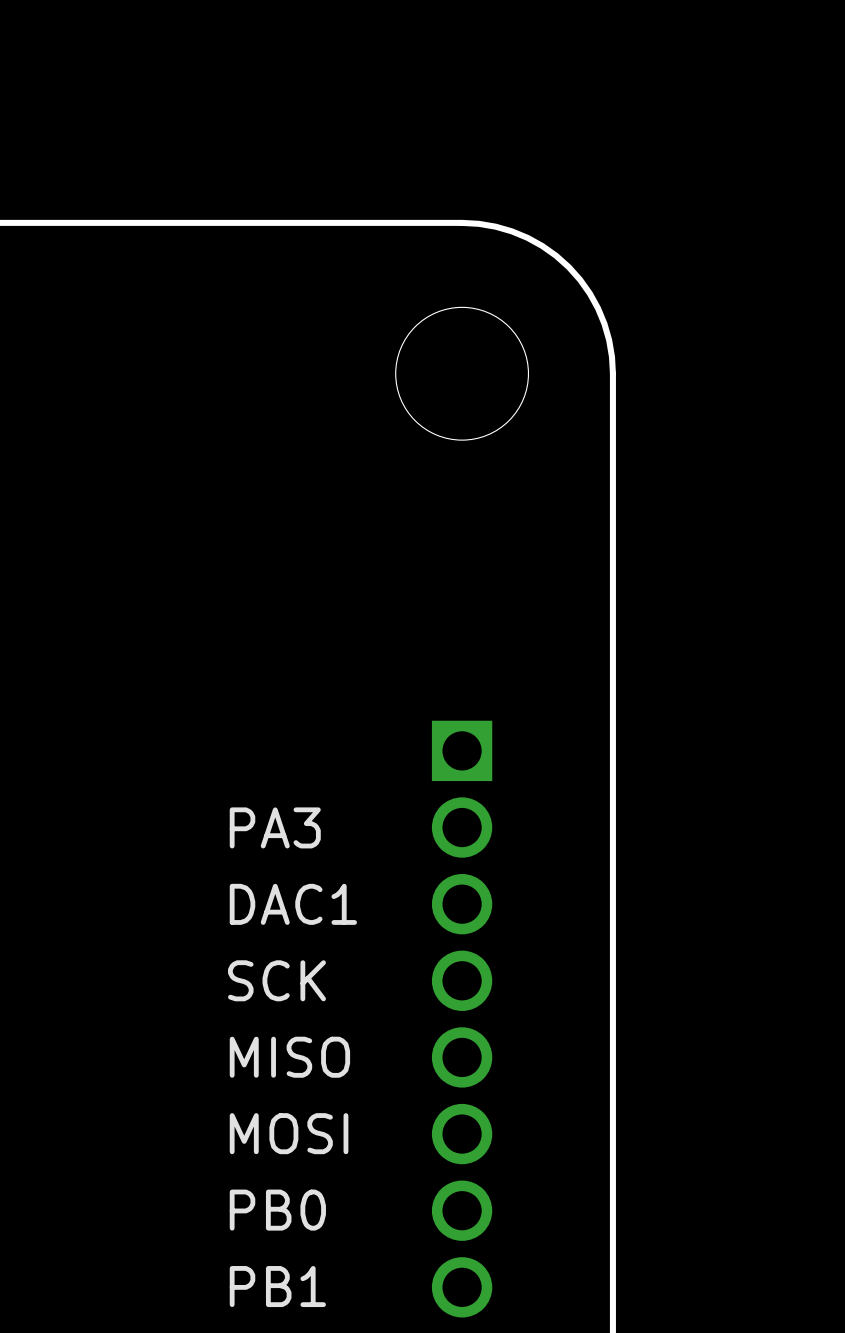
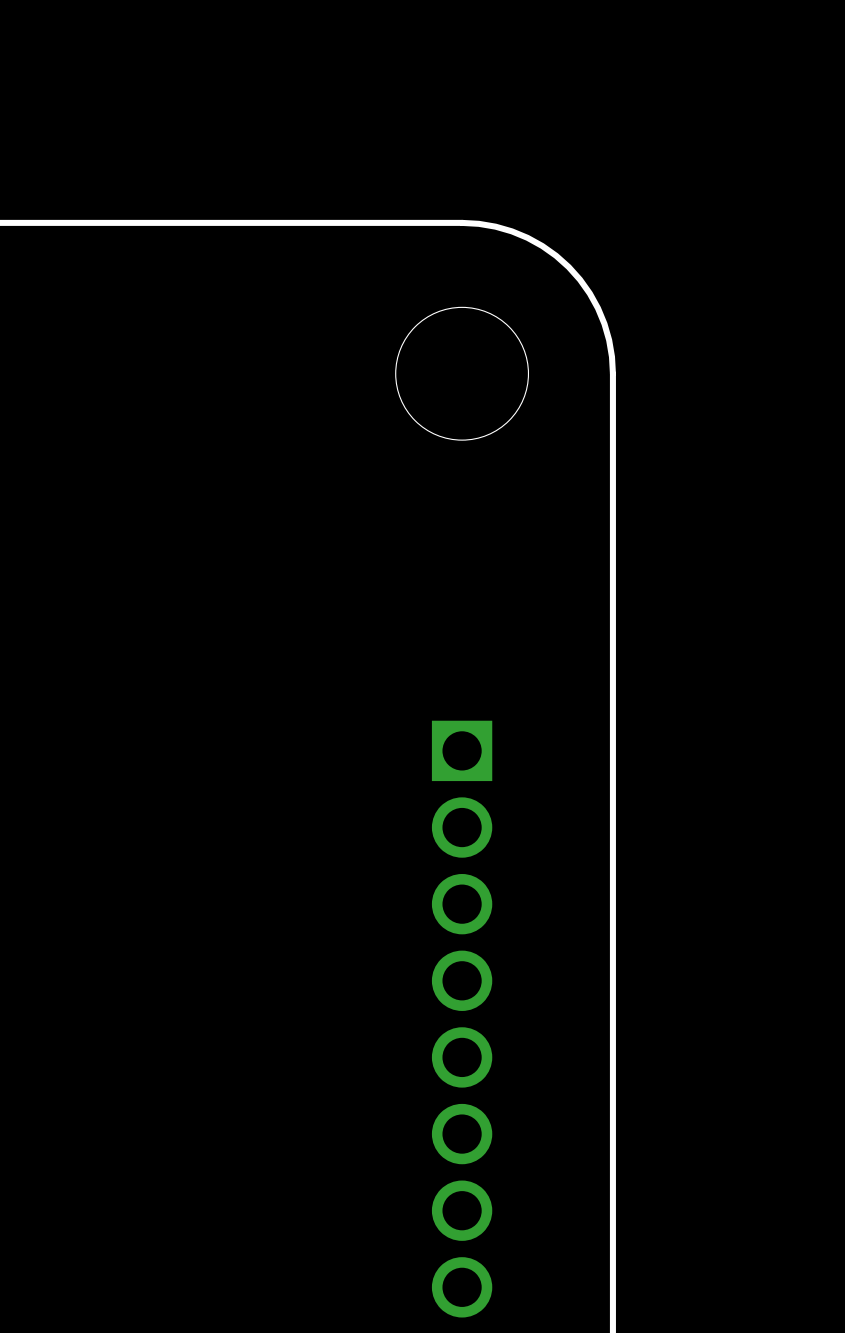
text: PA3 (275, 827) -> none
text: DAC1 (293, 904) -> none
text: SCK (276, 980) -> none
text: MISO (289, 1057) -> none
text: MOSI (289, 1133) -> none
text: PB0 (277, 1210) -> none
text: PB1 (277, 1286) -> none

